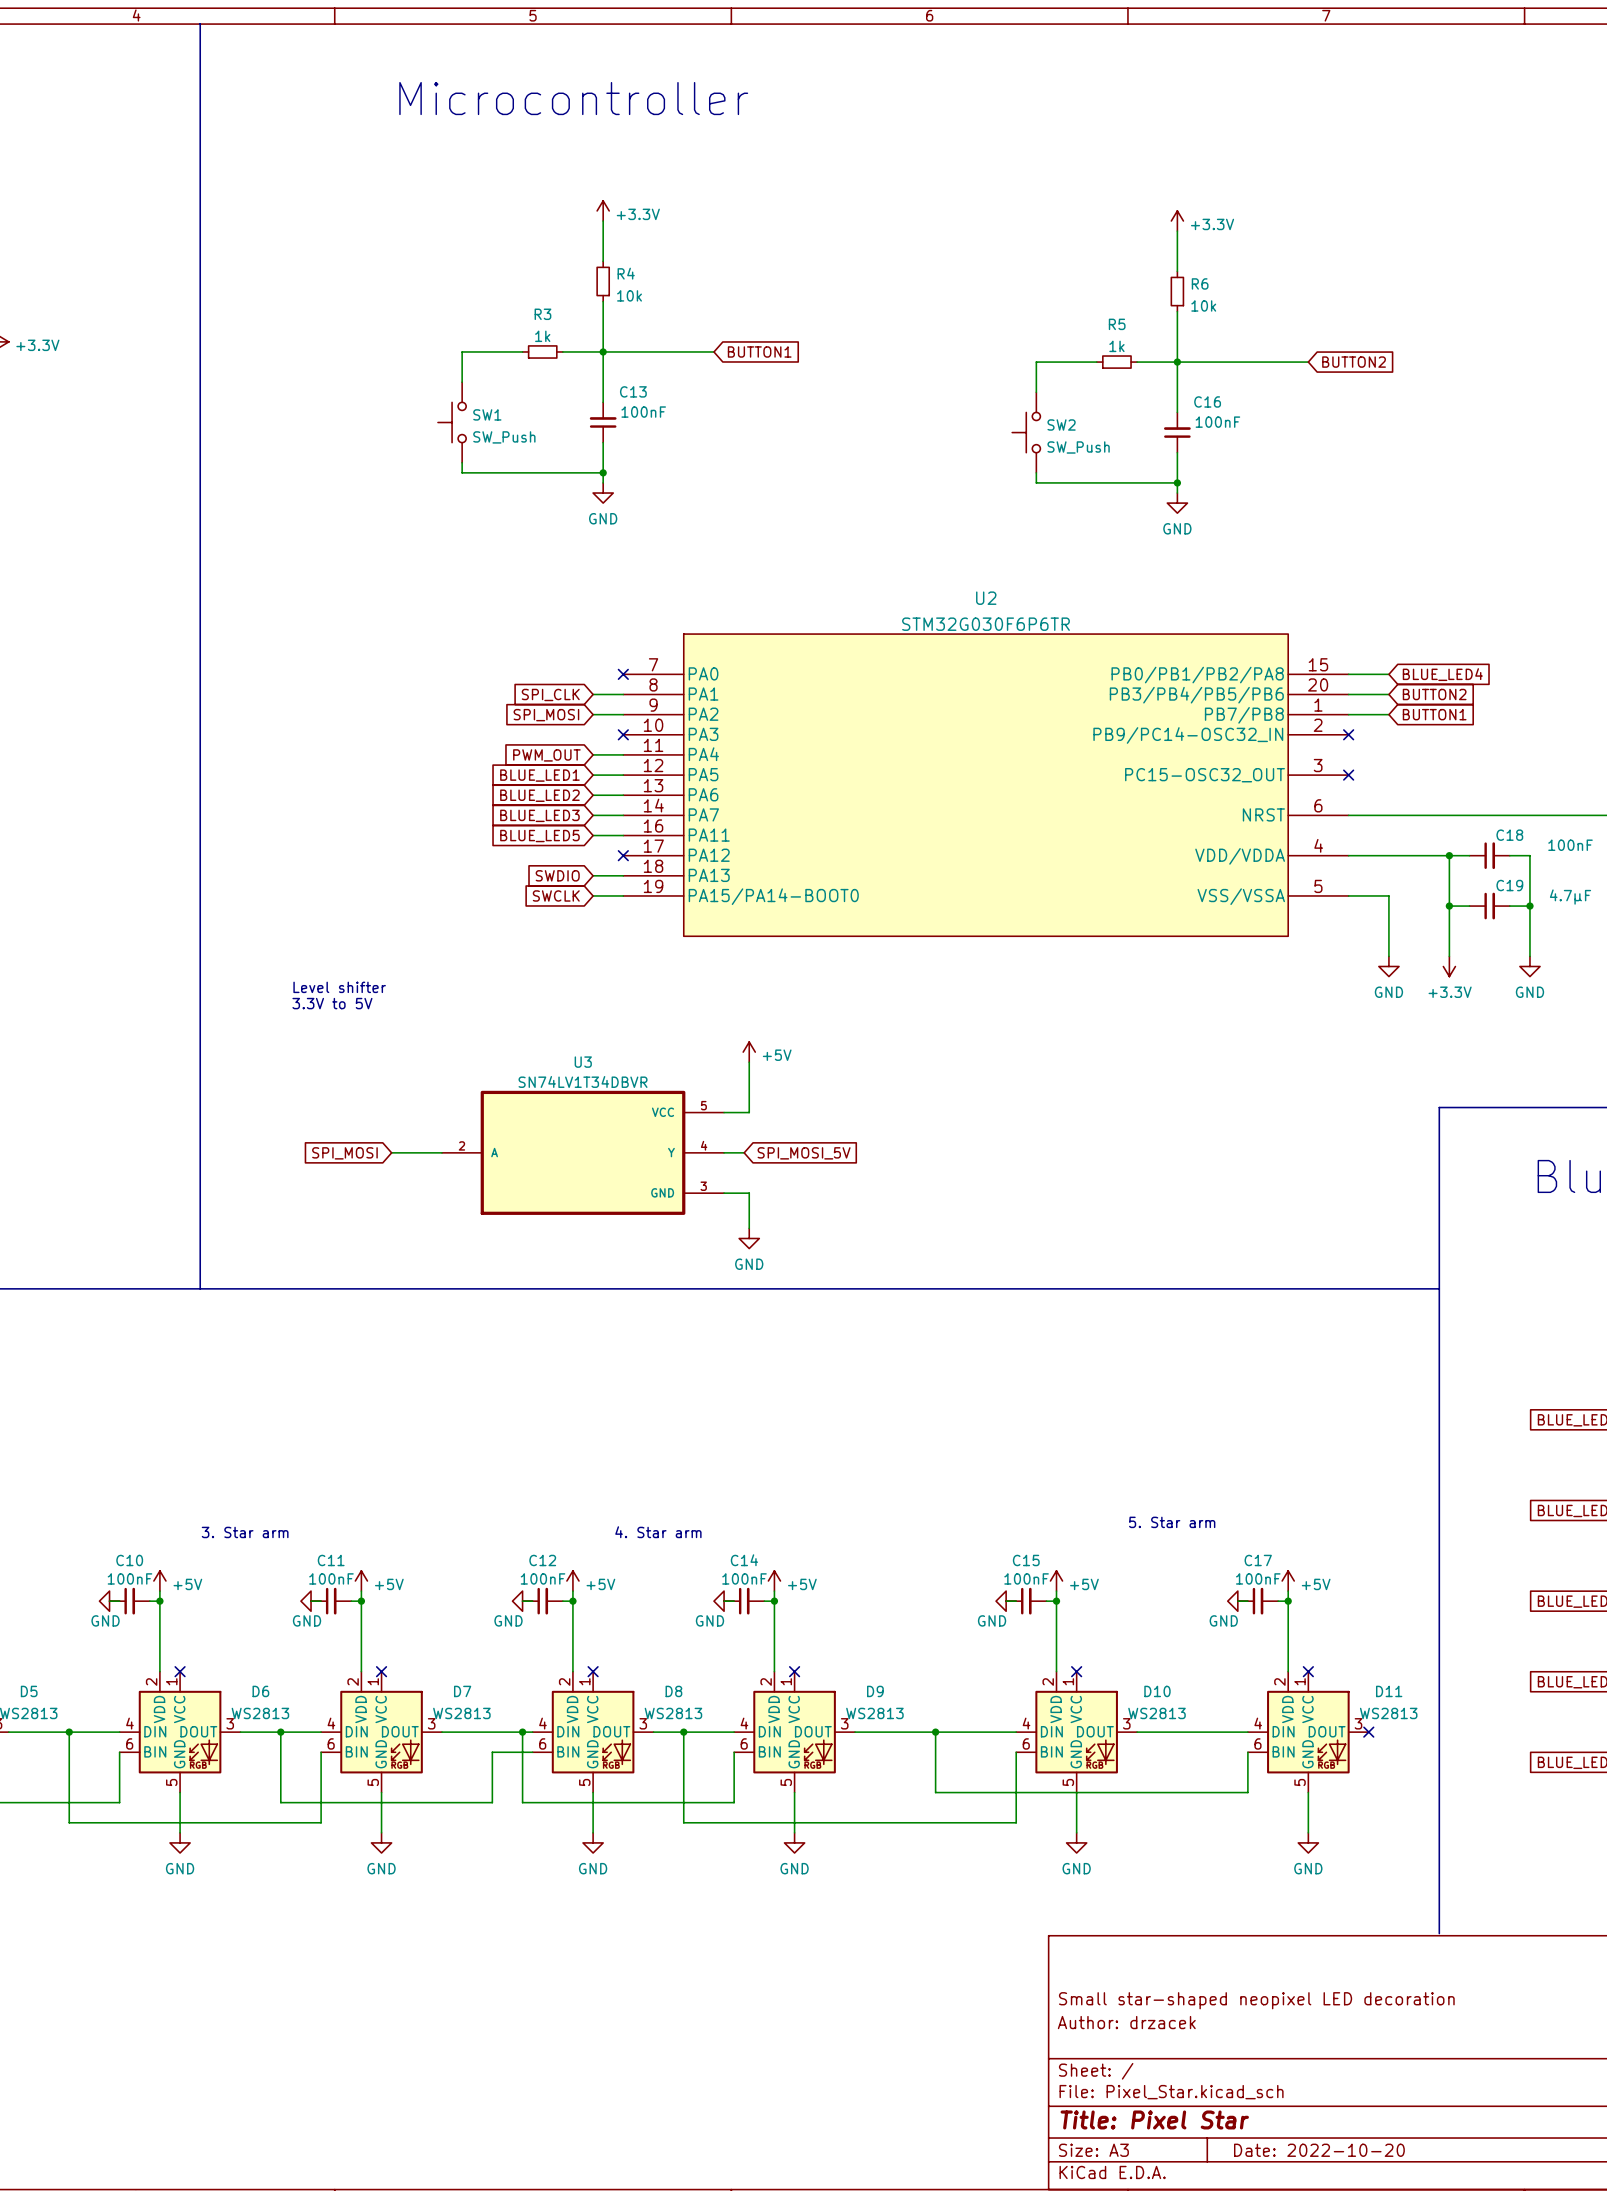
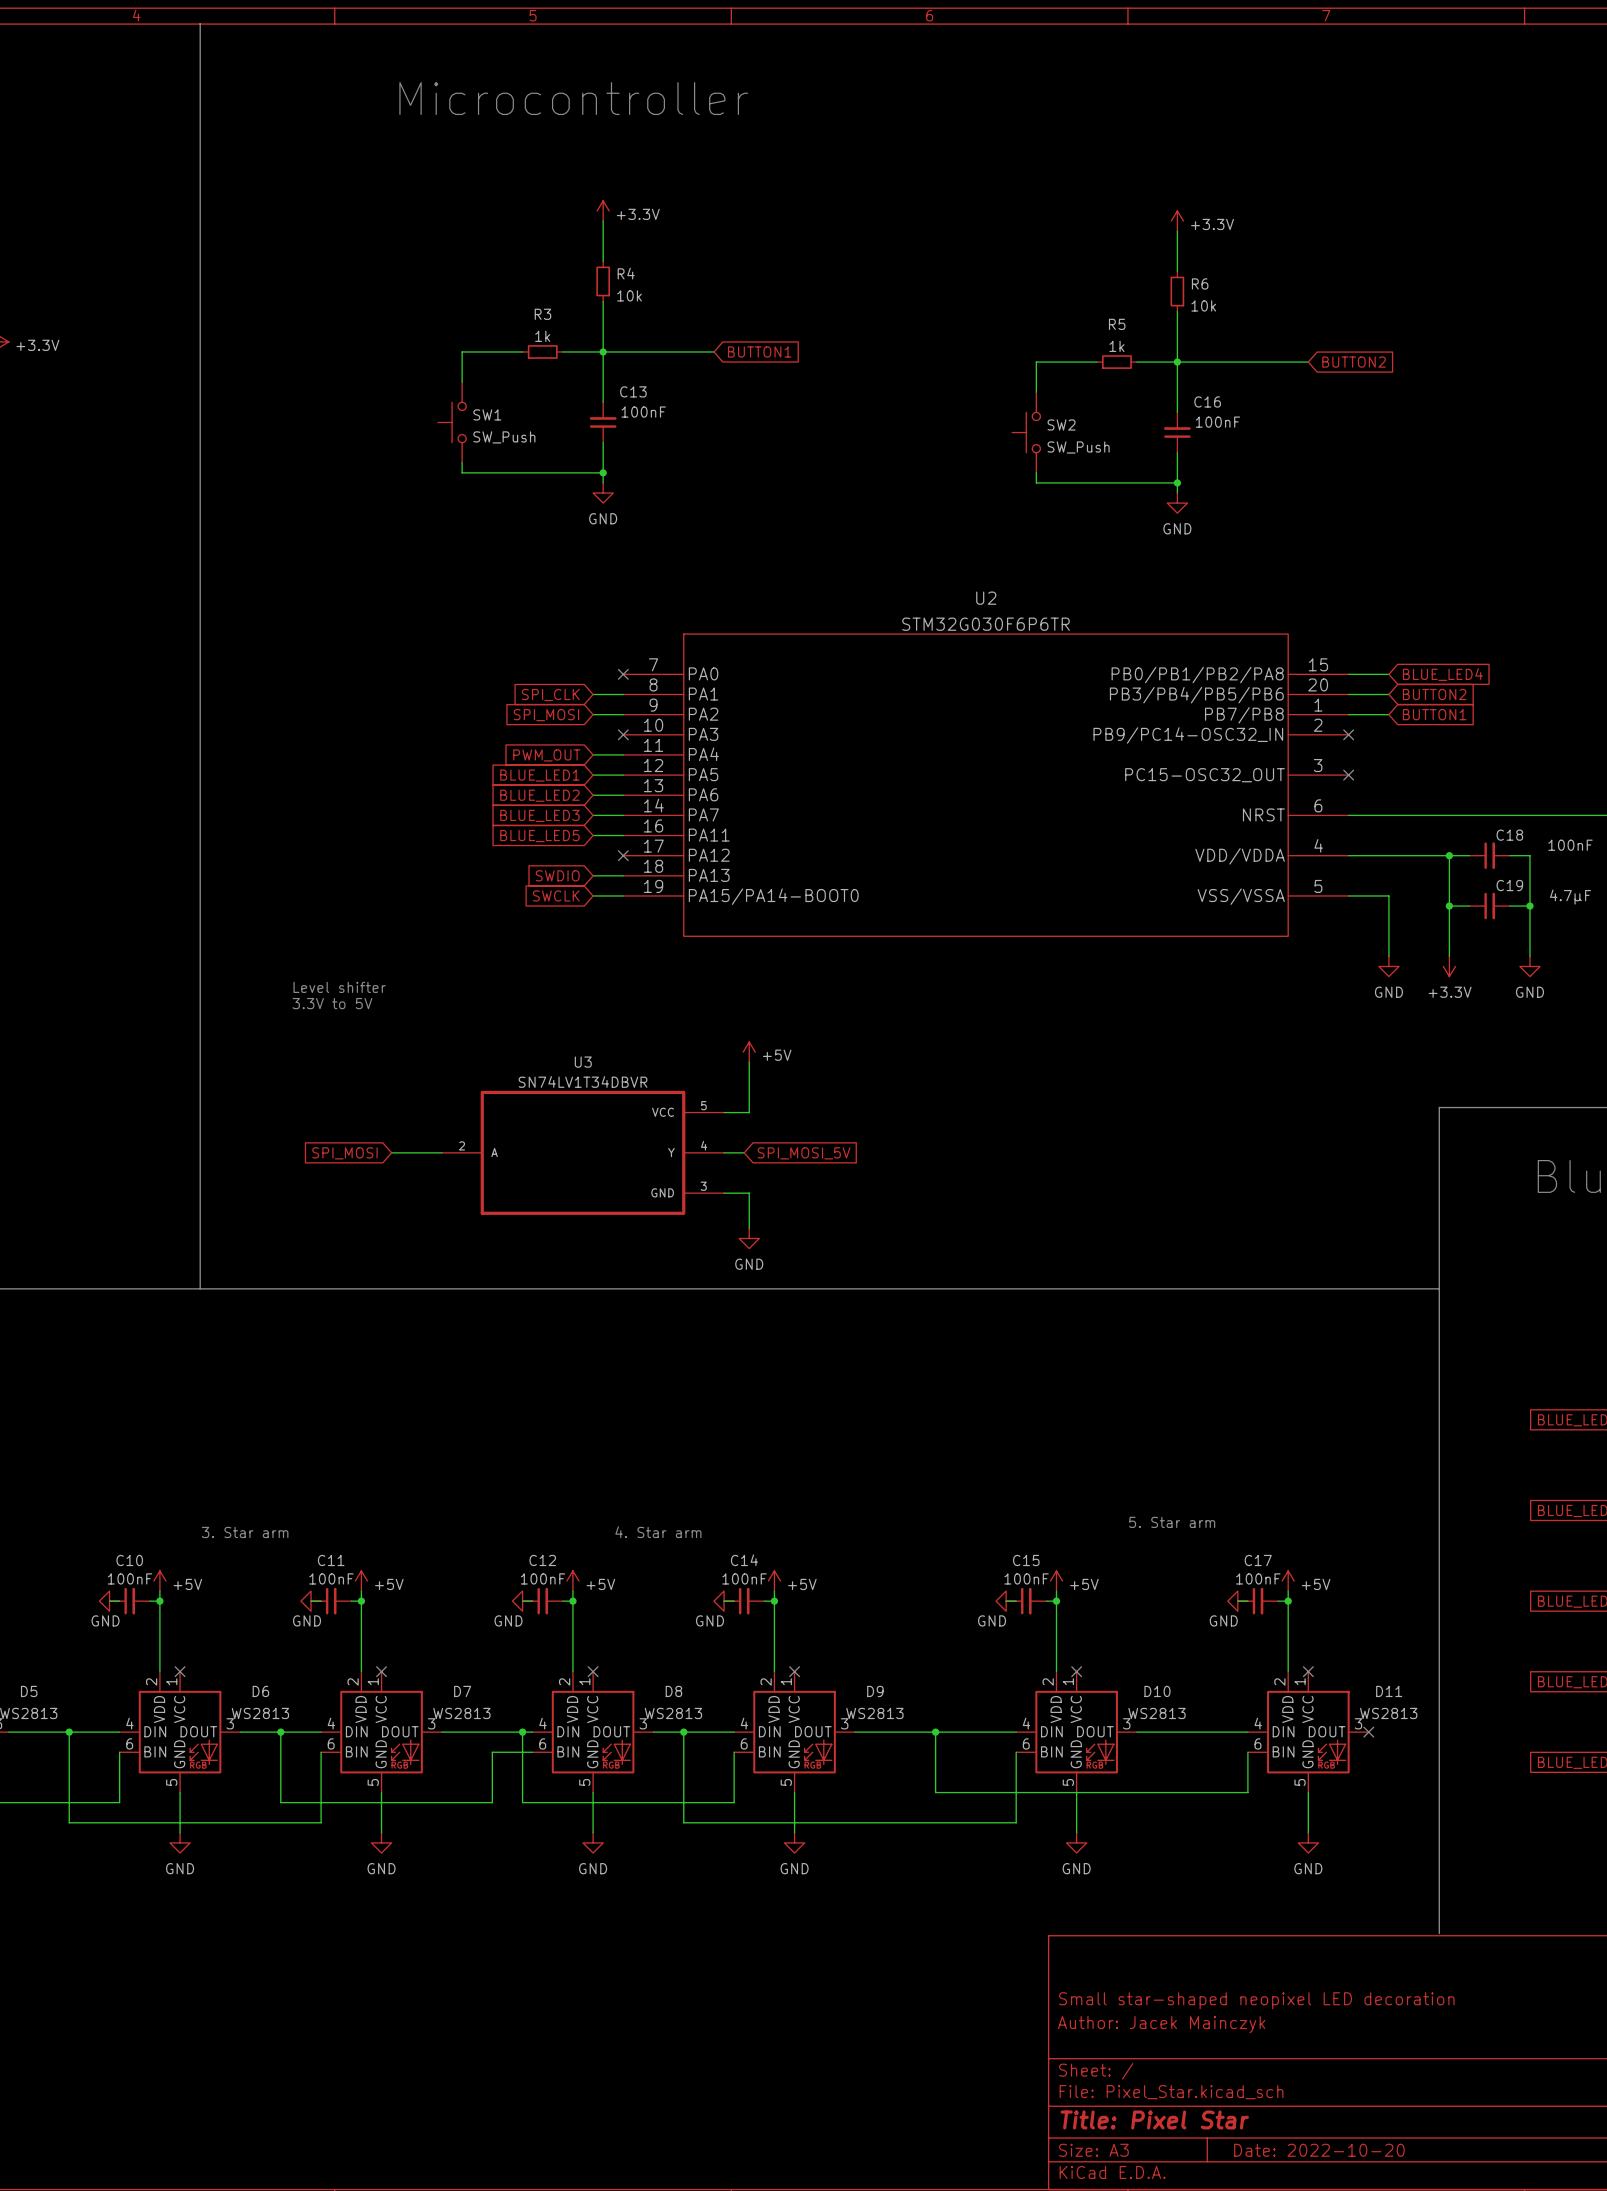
title block: Author: drzacek (1126, 2022) -> Author: Jacek Mainczyk (1161, 2024)

